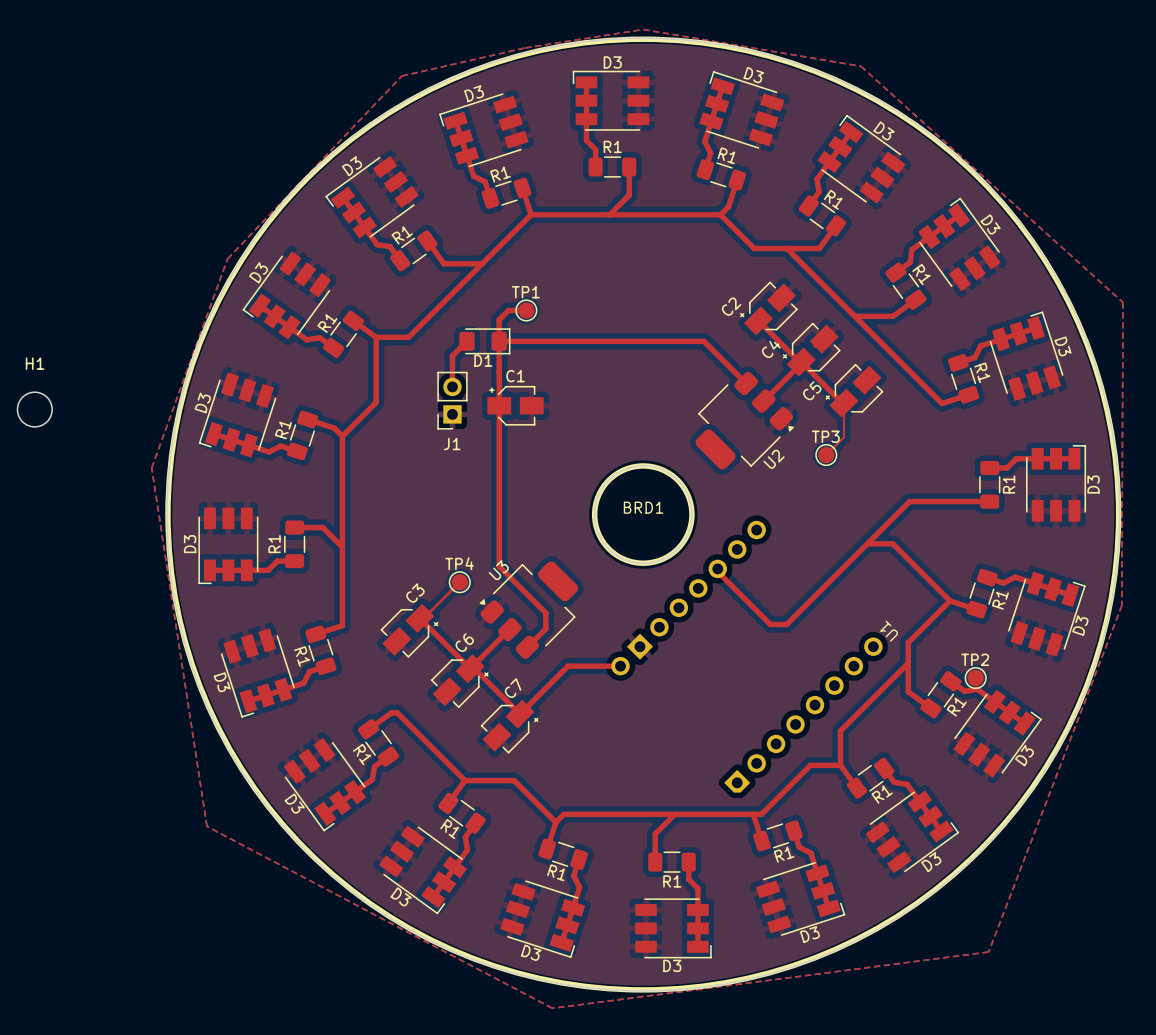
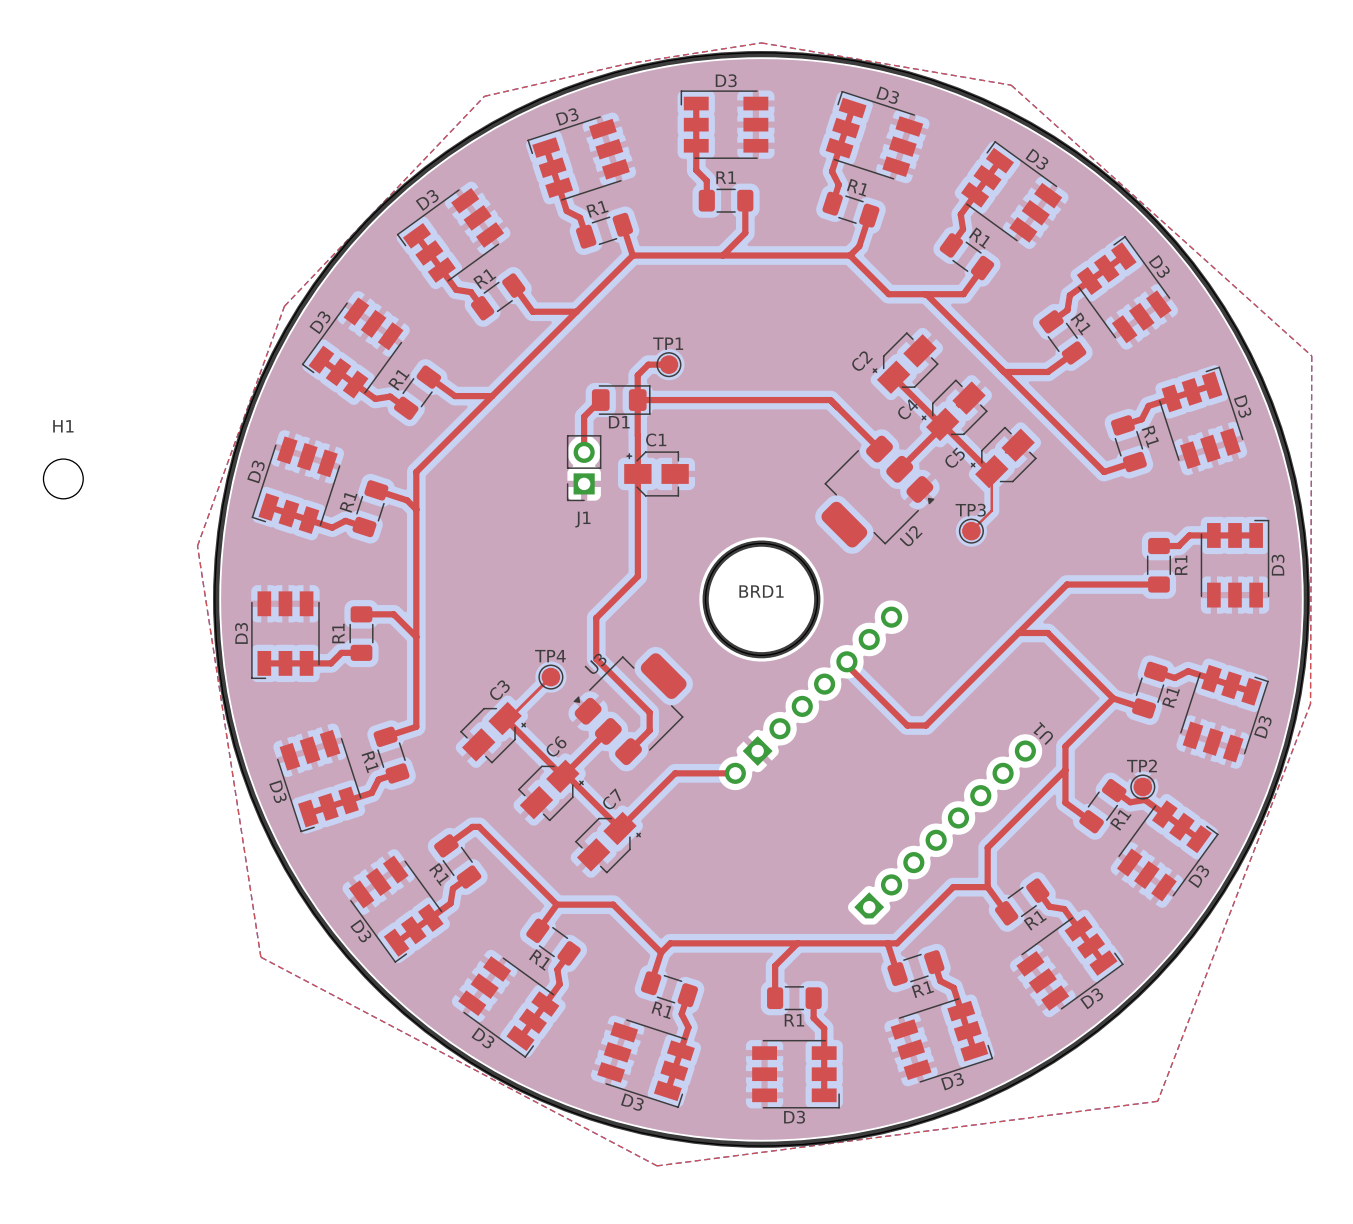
top track: (526, 310) (508, 310) (499, 319) (499, 372) -> (668, 364) (648, 364) (637, 375) (637, 435)
TP1 position: (526, 310) -> (668, 364)
top track: (376, 337) (376, 402) (342, 436) -> (492, 396) (416, 472) (416, 509)
top track: (466, 341) (452, 355) (452, 386) -> (600, 400) (584, 416) (584, 452)
D1 position: (484, 341) -> (621, 400)
top track: (499, 341) (703, 341) -> (637, 400) (831, 400)
top track: (499, 372) (499, 530) -> (637, 435) (637, 576) (596, 618)
J1 position: (452, 400) -> (584, 468)
C1 position: (515, 405) -> (656, 473)

